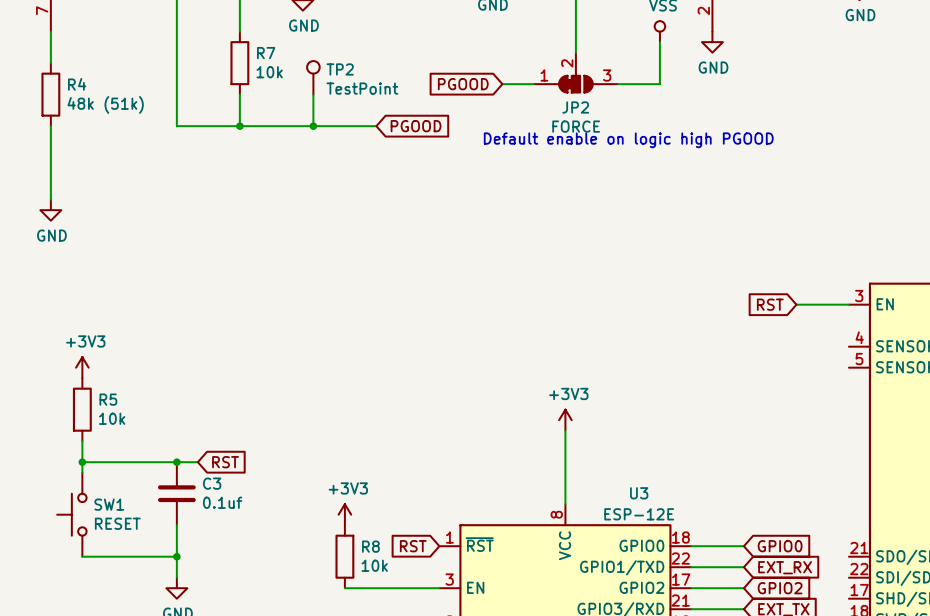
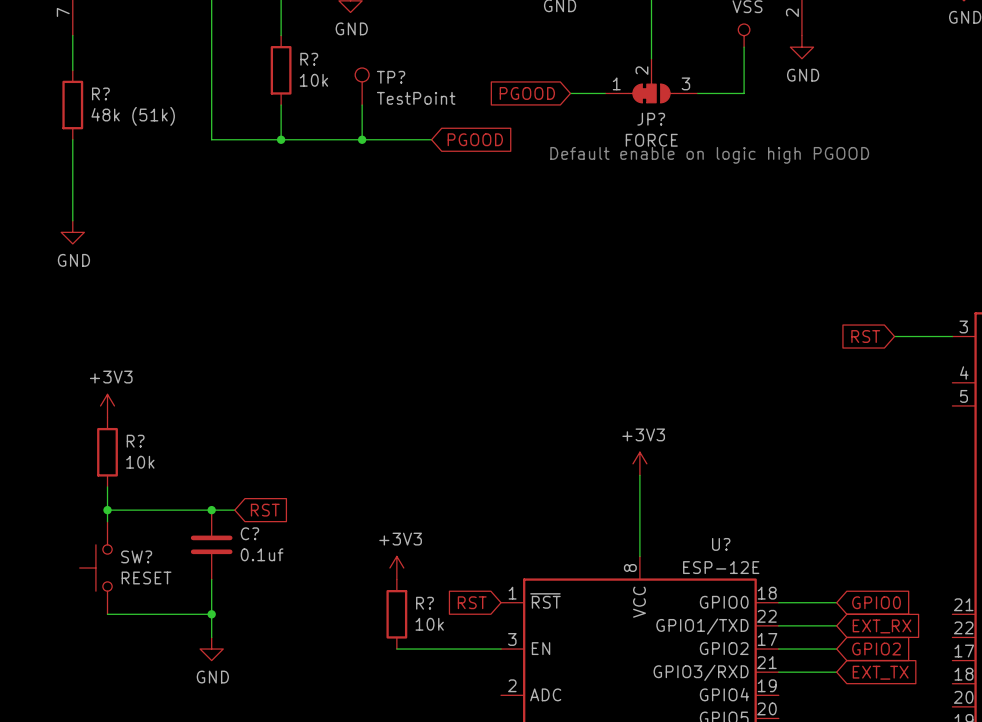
R7 name: R7 (266, 53) -> R? (309, 59)
TP2 name: TP2 (340, 69) -> TP? (391, 77)
R4 name: R4 (77, 84) -> R? (100, 93)
JP2 name: JP2 (575, 107) -> JP? (651, 119)
R5 name: R5 (108, 399) -> R? (135, 441)
C3 name: C3 (212, 483) -> C? (249, 533)
U3 name: U3 (639, 493) -> U? (721, 544)
SW1 name: SW1 (109, 504) -> SW? (136, 556)
R8 name: R8 (370, 546) -> R? (425, 603)

